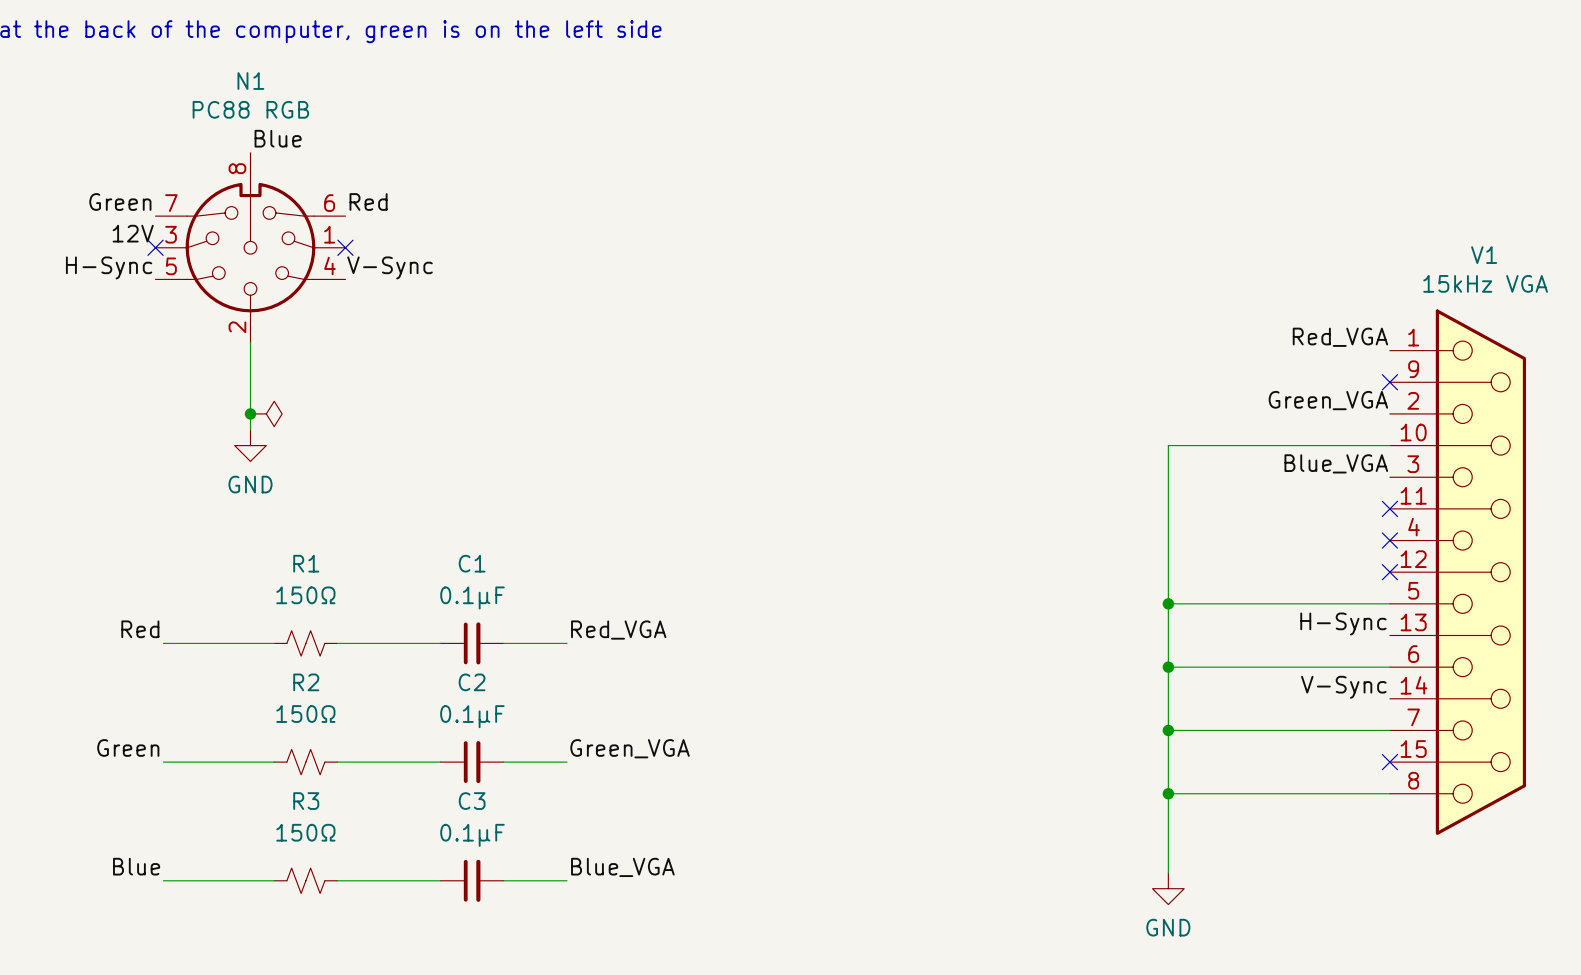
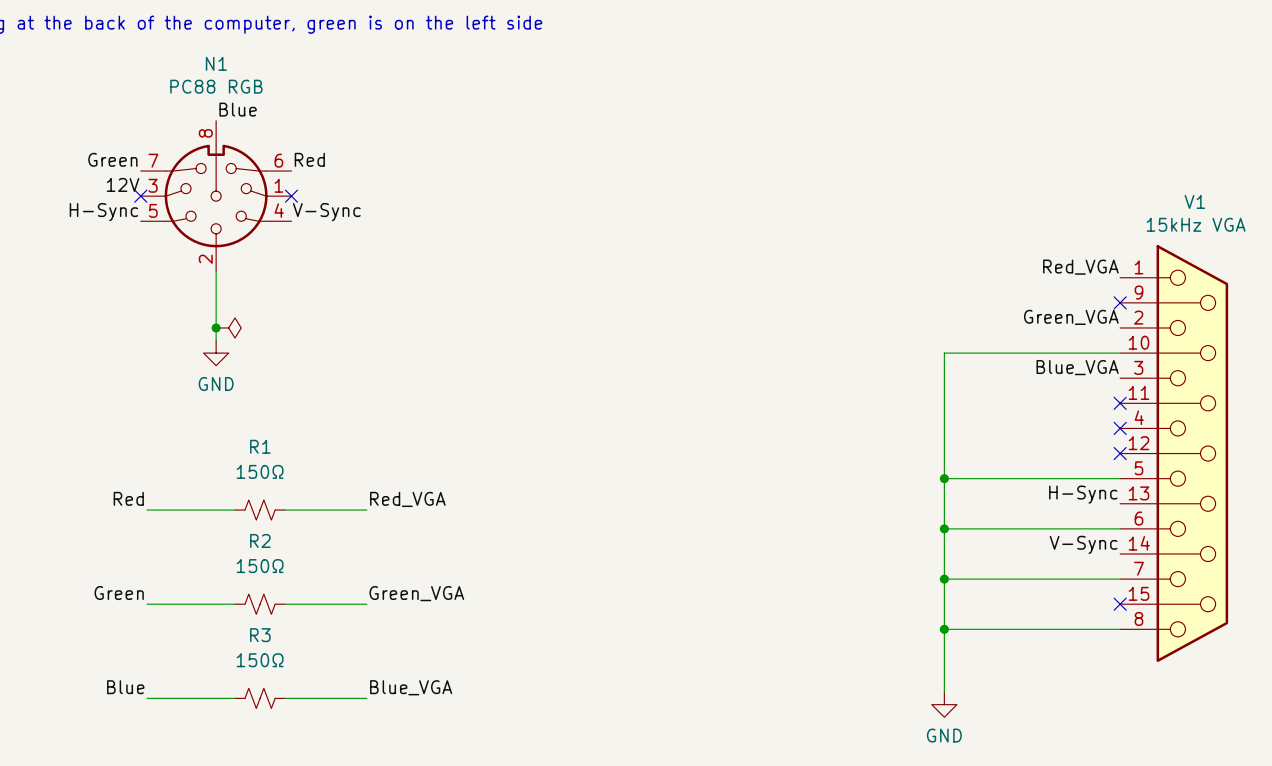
label position: Red_VGA (618, 630) -> Red_VGA (407, 499)
C1: 0.1µF (472, 643) -> none
wire: (503, 643) (567, 643) -> none
label position: Green_VGA (630, 748) -> Green_VGA (416, 593)
C2: 0.1µF (472, 762) -> none
wire: (503, 762) (567, 762) -> none
label position: Blue_VGA (622, 867) -> Blue_VGA (411, 687)
C3: 0.1µF (472, 880) -> none
wire: (503, 880) (567, 880) -> none

